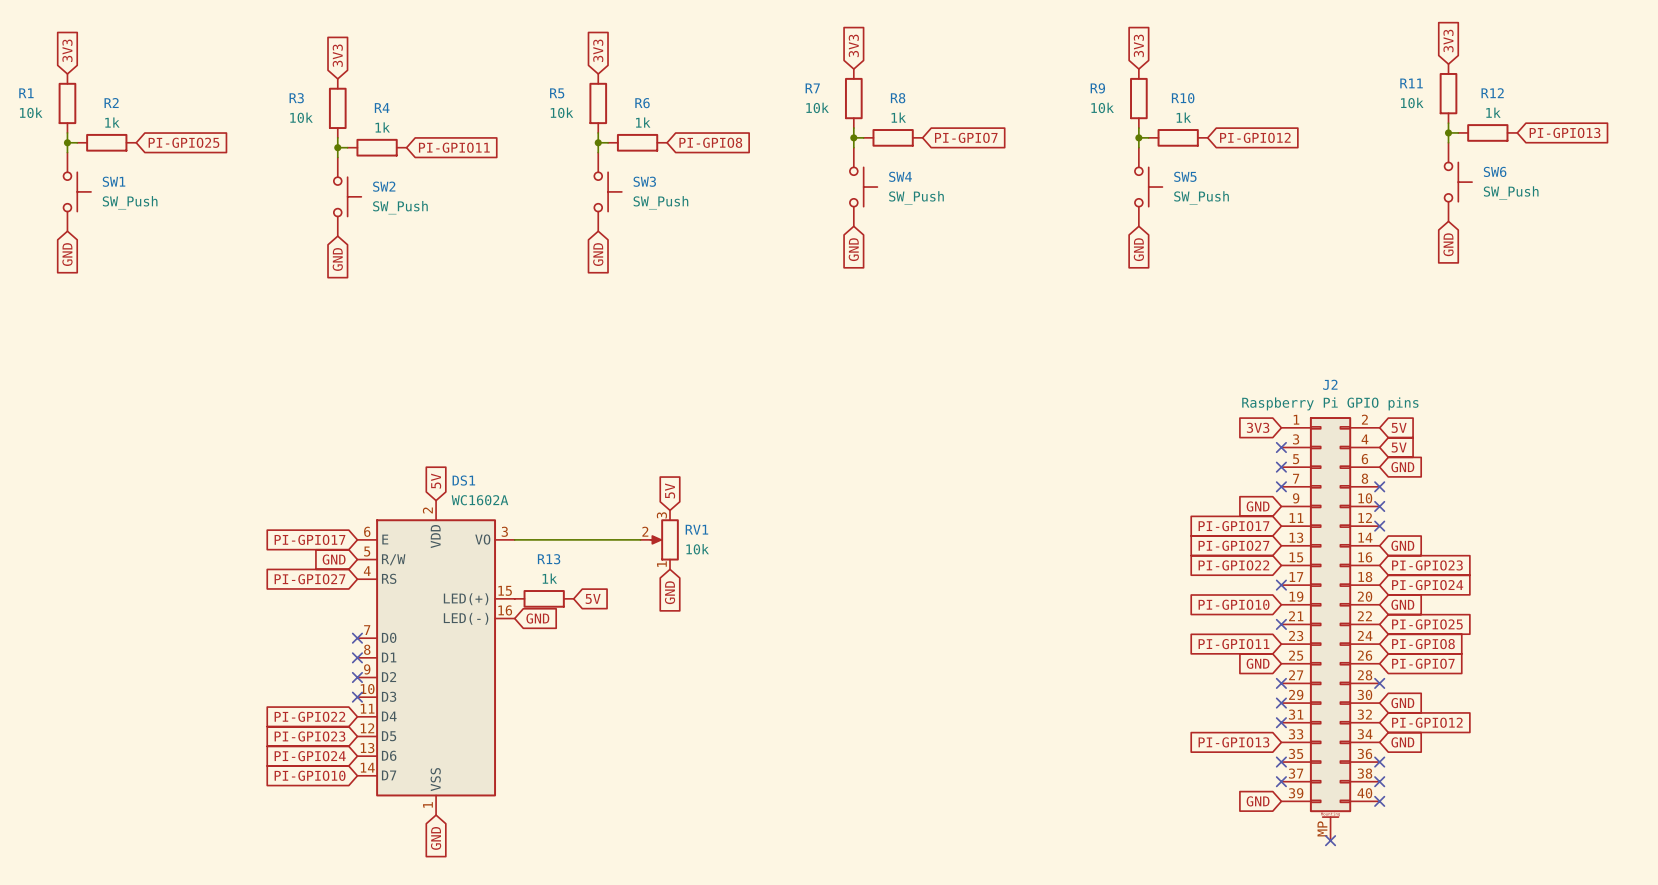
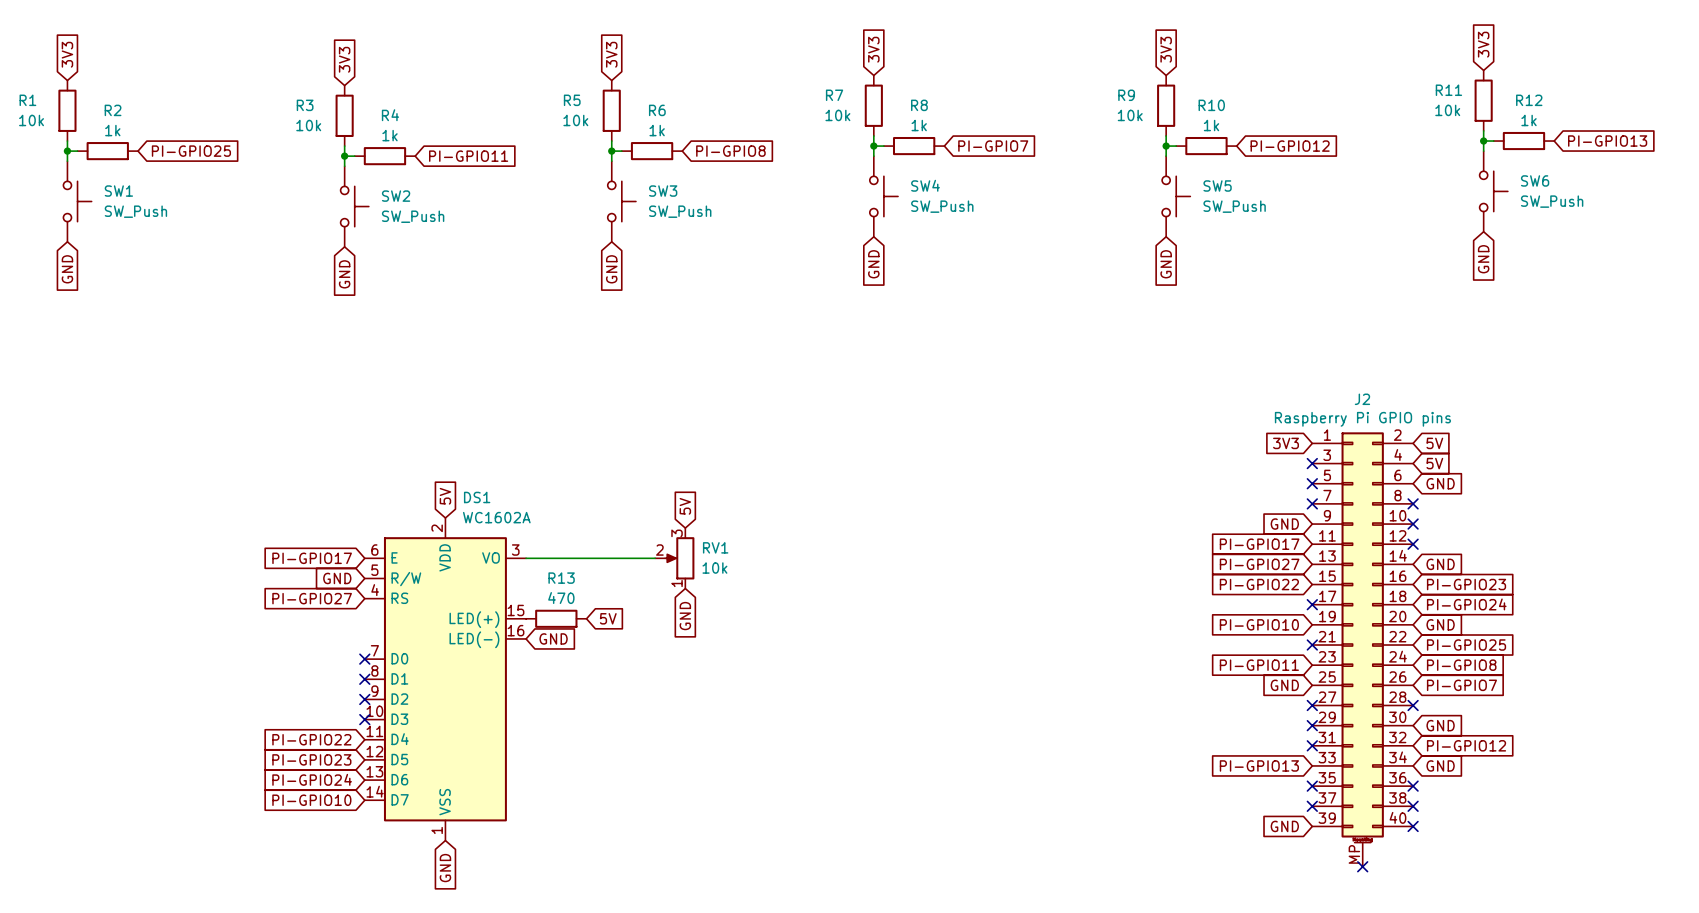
R13 value: 1k (549, 578) -> 470 (561, 598)

